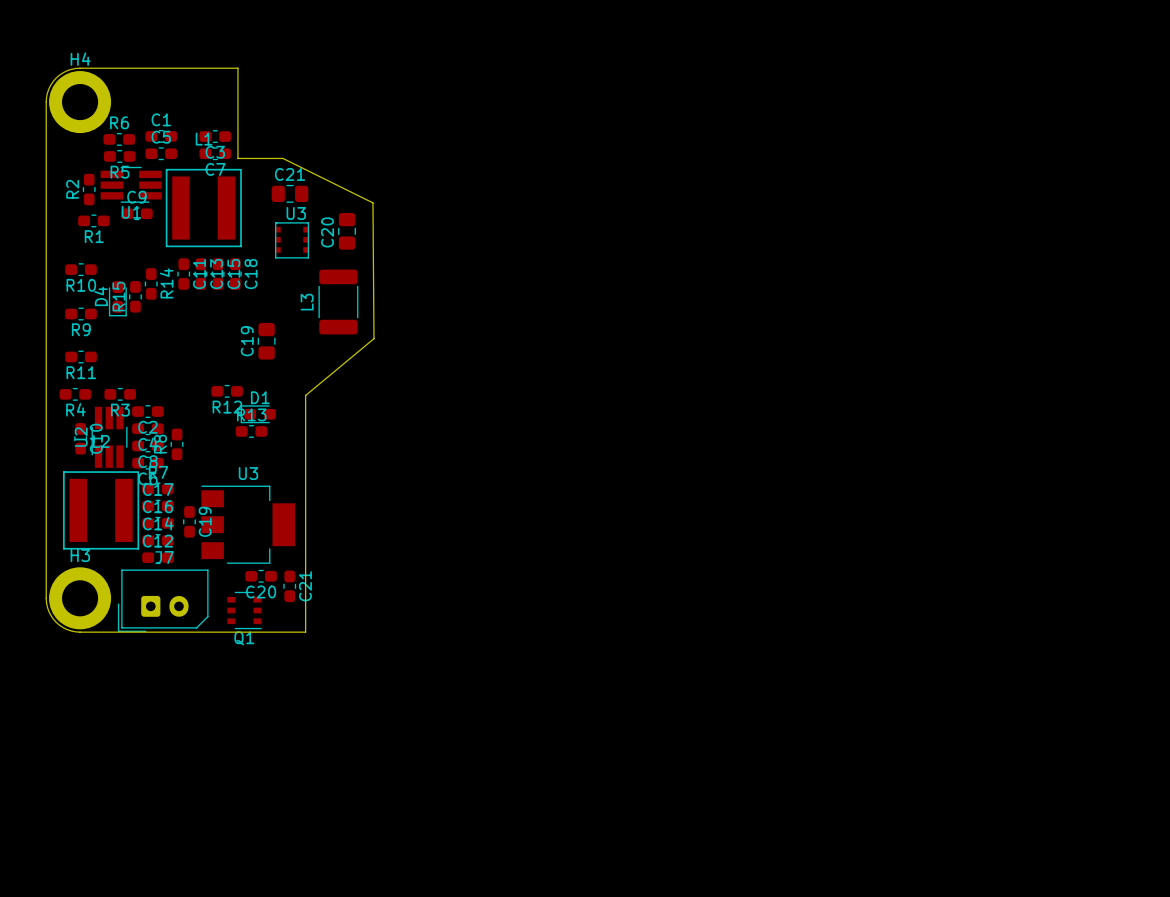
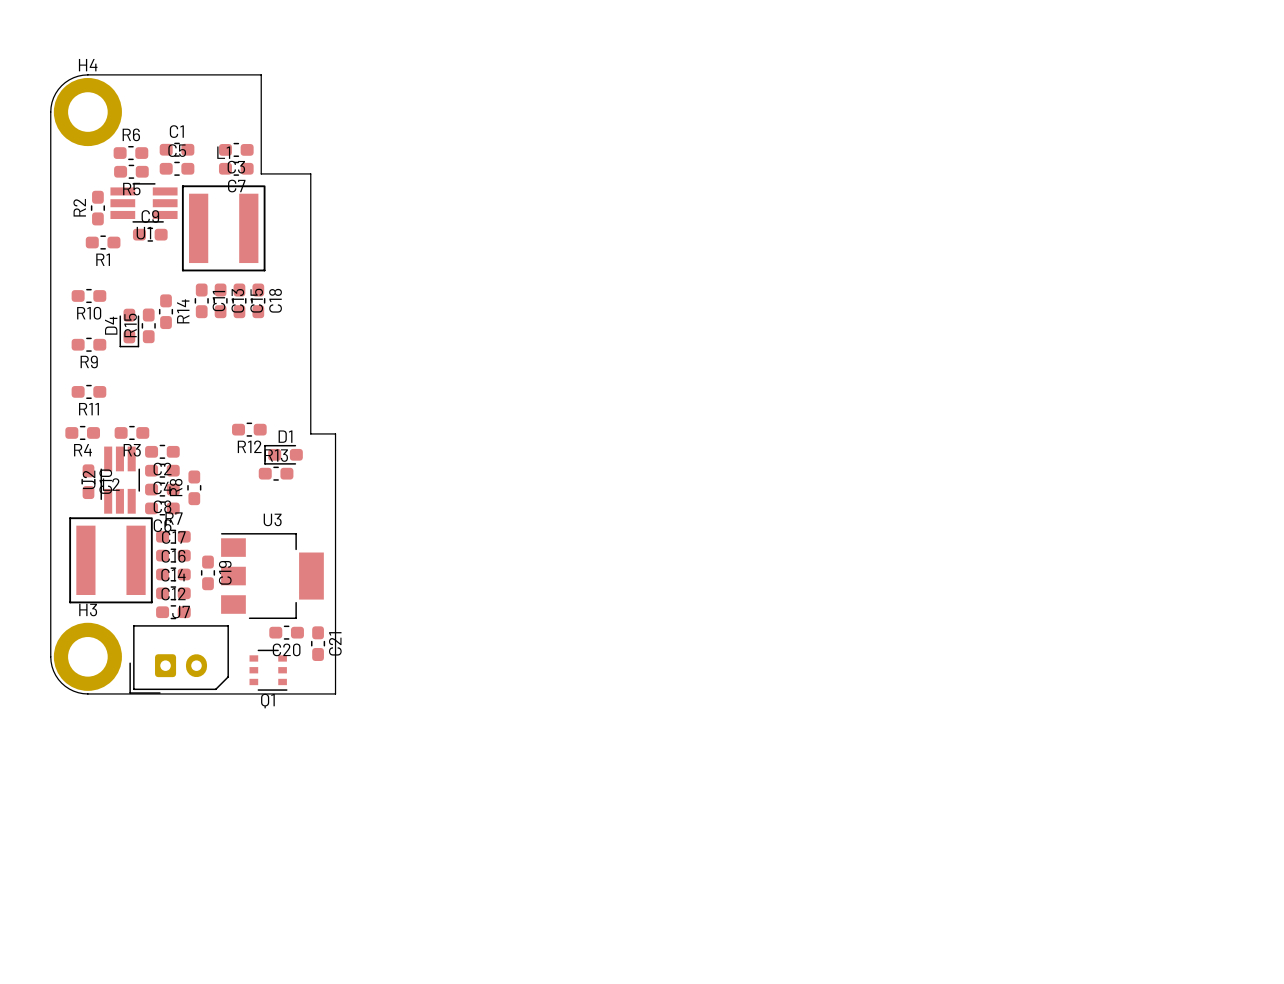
board edge: (282, 158) (372, 202) (373, 338) (305, 395) -> (310, 173) (310, 433) (335, 433)
C21: (289, 193) -> none
C20: (347, 231) -> none
U3: (292, 240) -> none
L3: (338, 302) -> none
C19: (266, 341) -> none

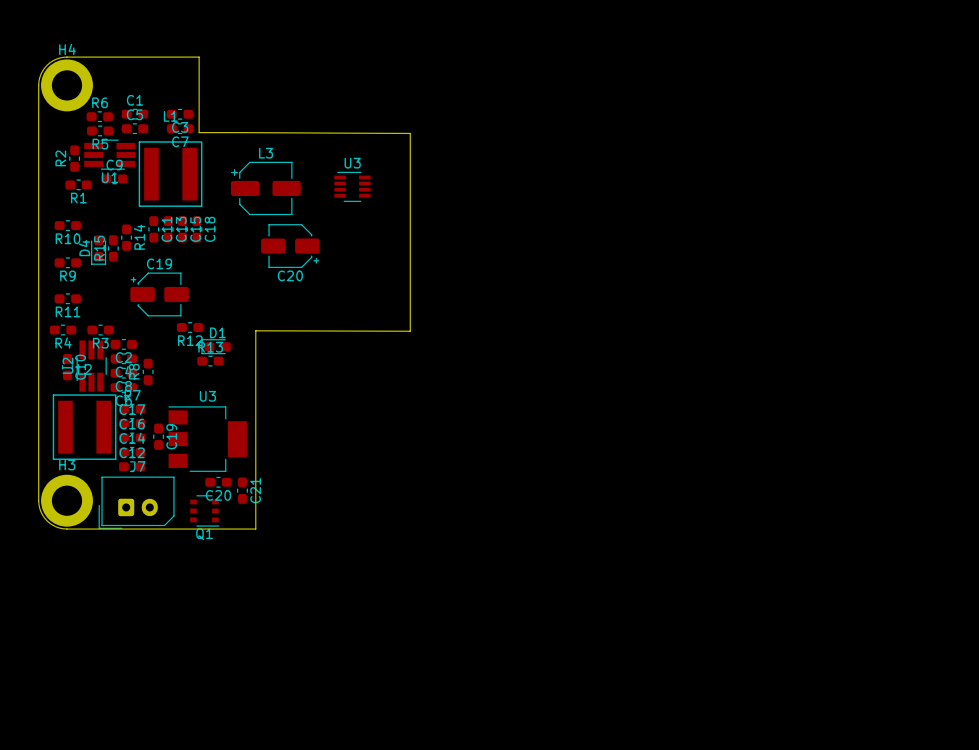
board edge: (310, 173) (310, 433) (335, 433) -> (236, 132) (410, 133) (410, 331) (255, 330)
U3: none -> (352, 186)
L3: none -> (265, 188)
C20: none -> (290, 246)
C19: none -> (159, 294)

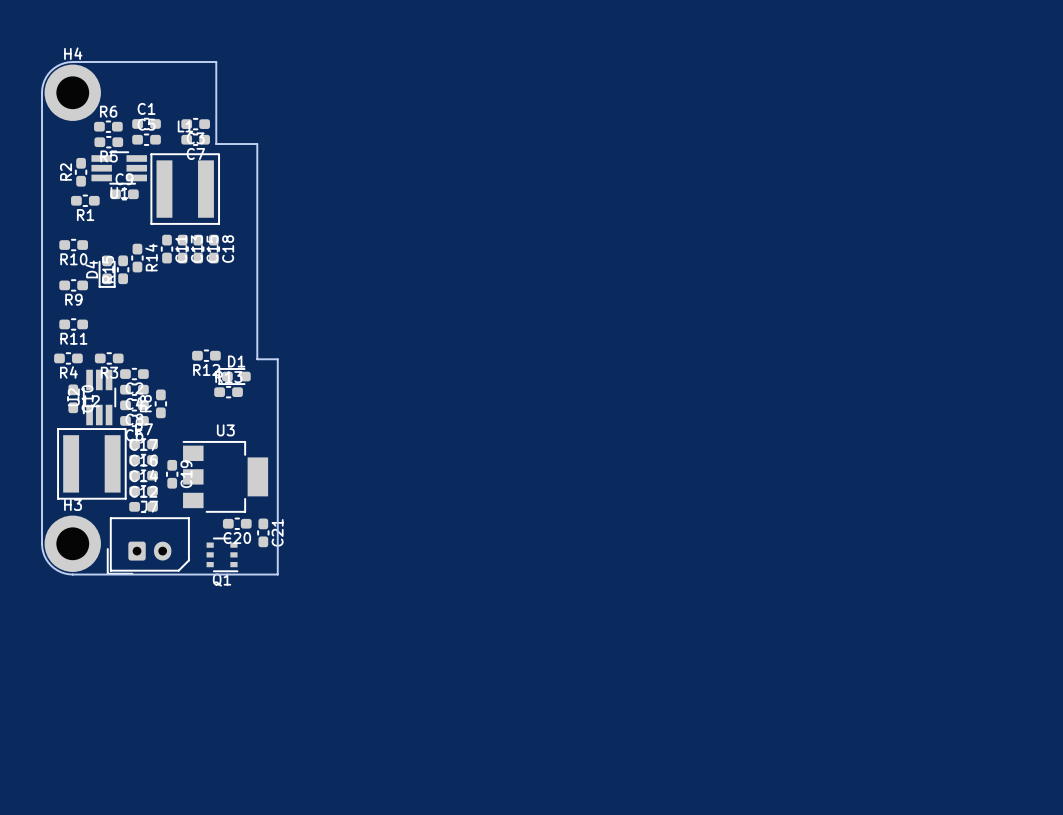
board edge: (236, 132) (410, 133) (410, 331) (255, 330) -> (257, 144) (257, 359) (277, 359)
U3: (352, 186) -> none
L3: (265, 188) -> none
C20: (290, 246) -> none
C19: (159, 294) -> none

